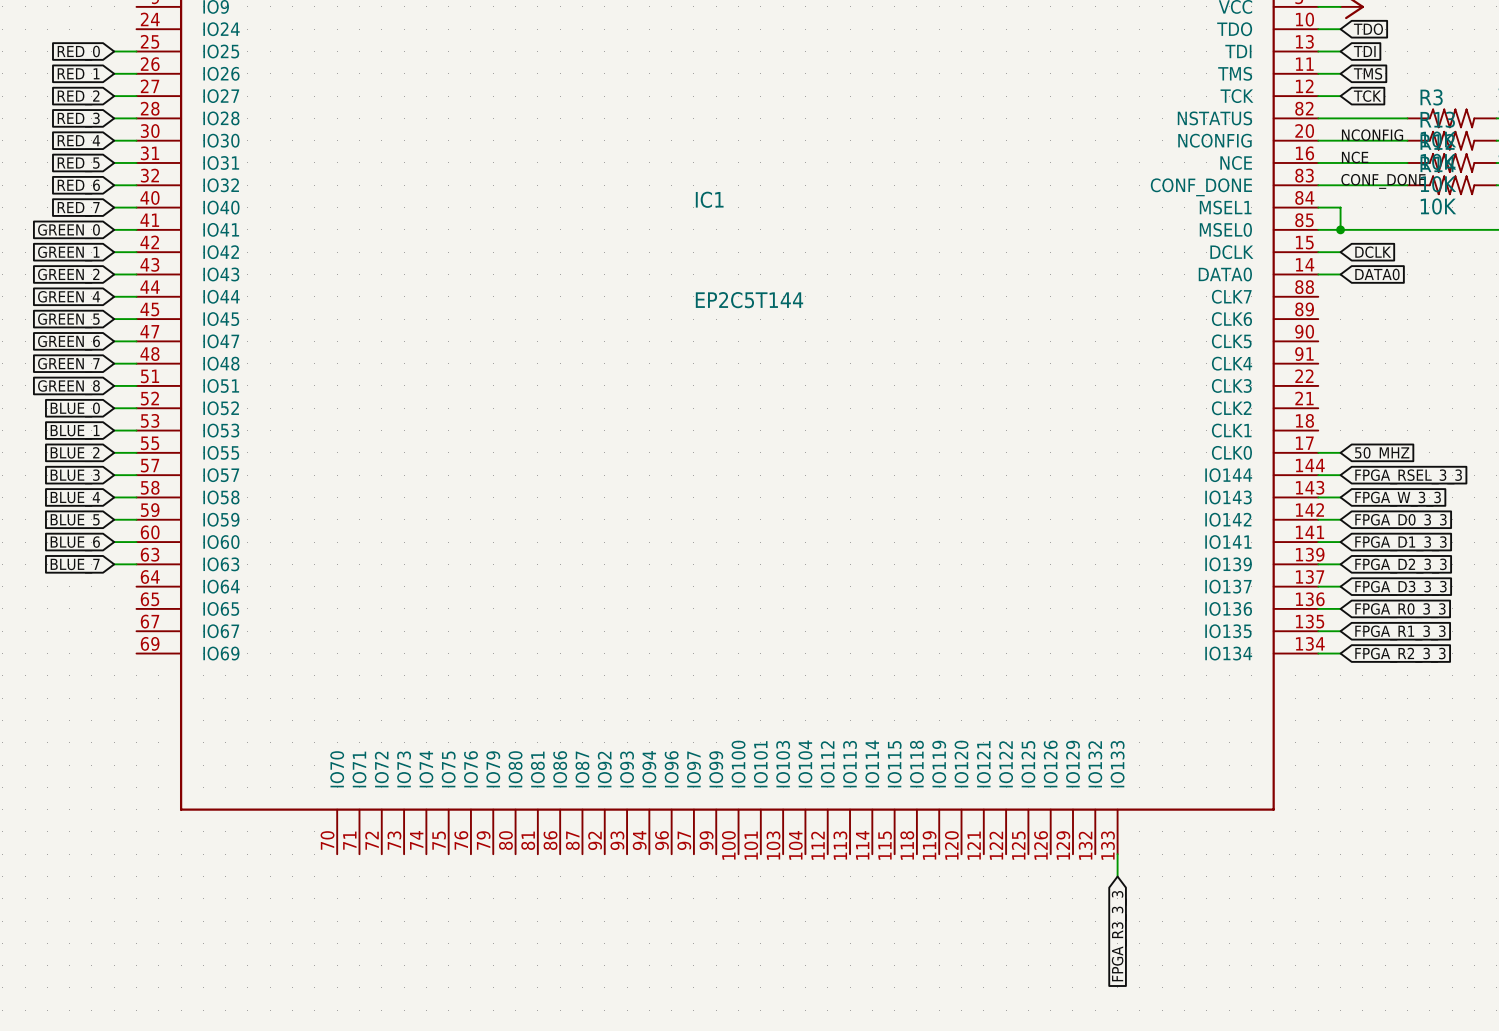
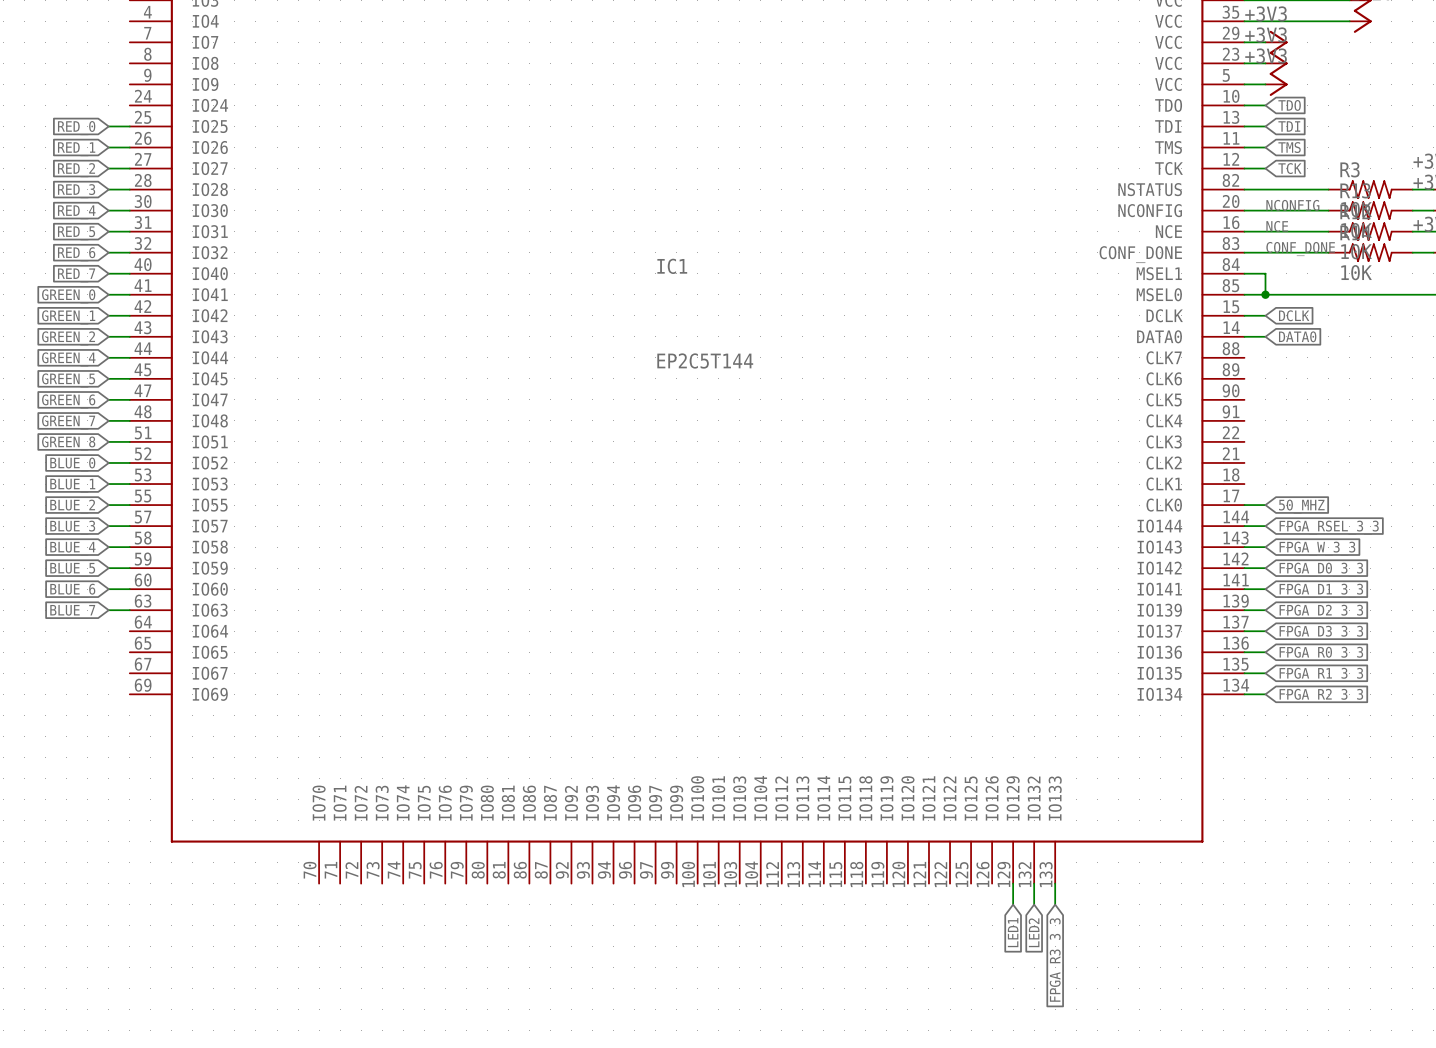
wire: none -> (1013, 883) (1013, 904)
wire: none -> (1034, 883) (1034, 904)
global label: none -> LED1 (1013, 932)
global label: none -> LED2 (1034, 932)

